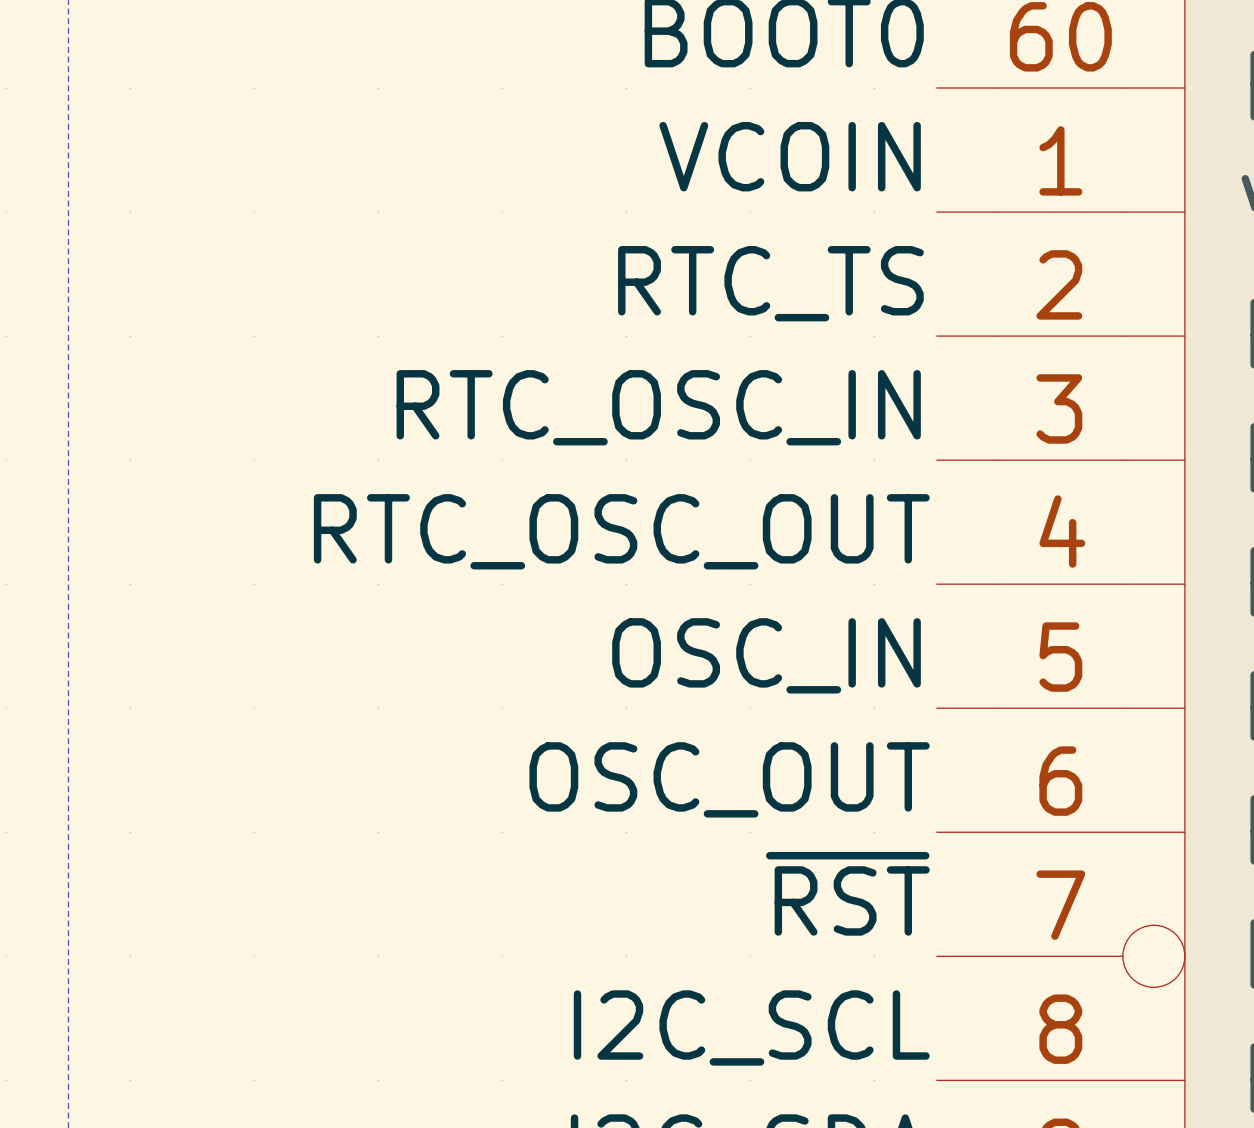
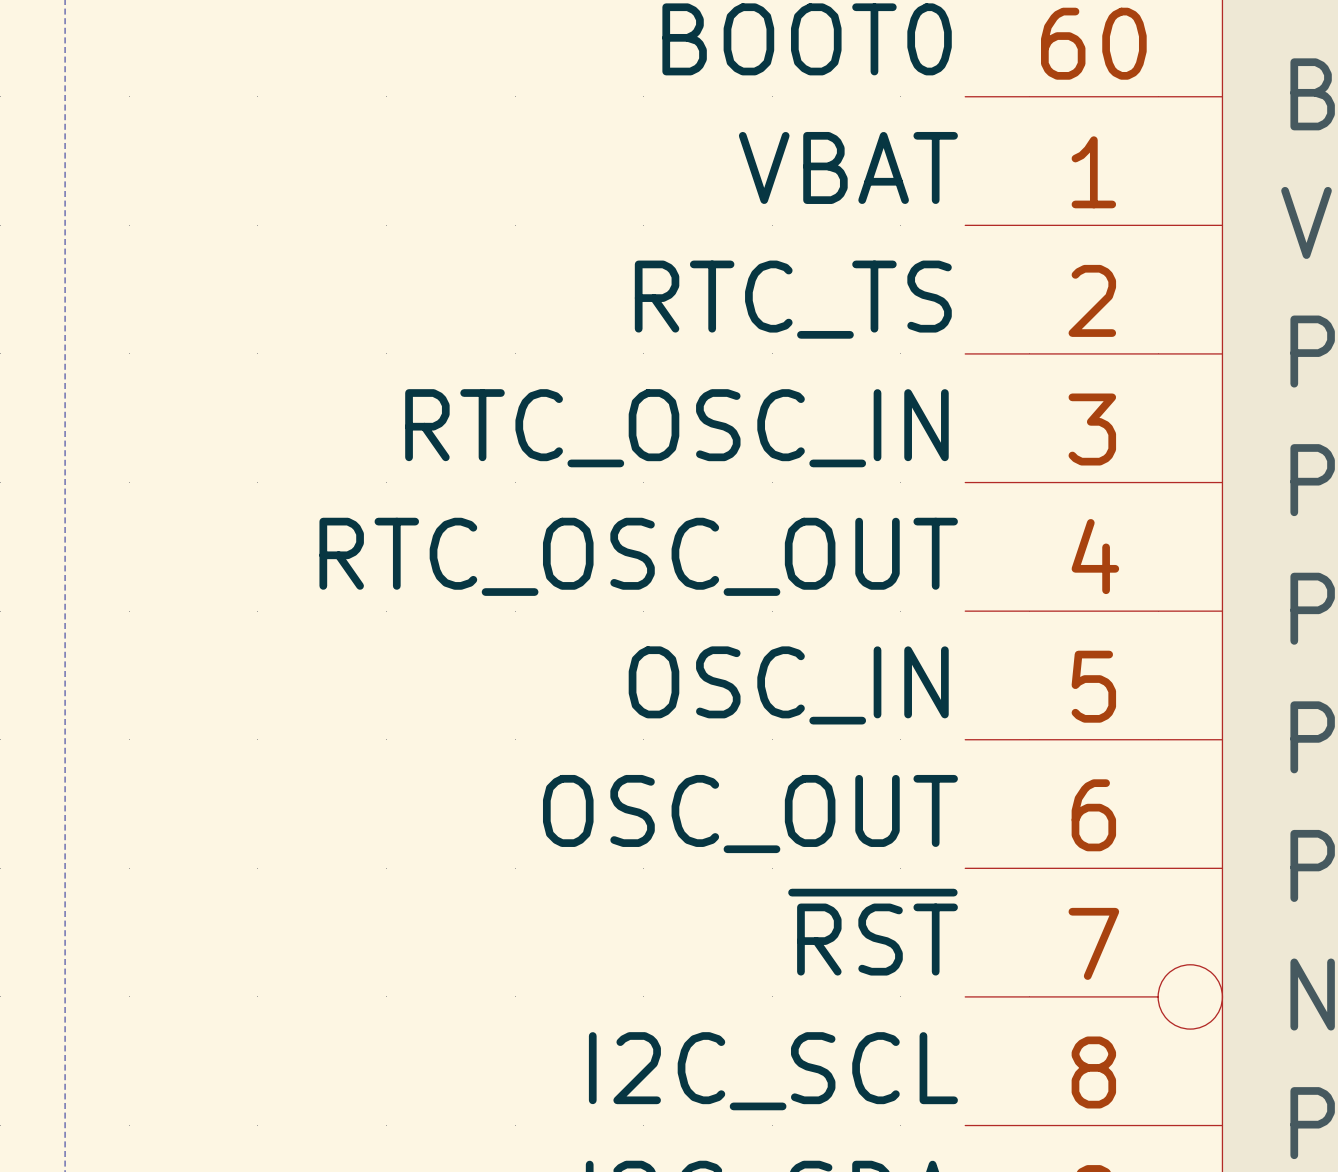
label: VCOIN (790, 156) -> VBAT (848, 167)

